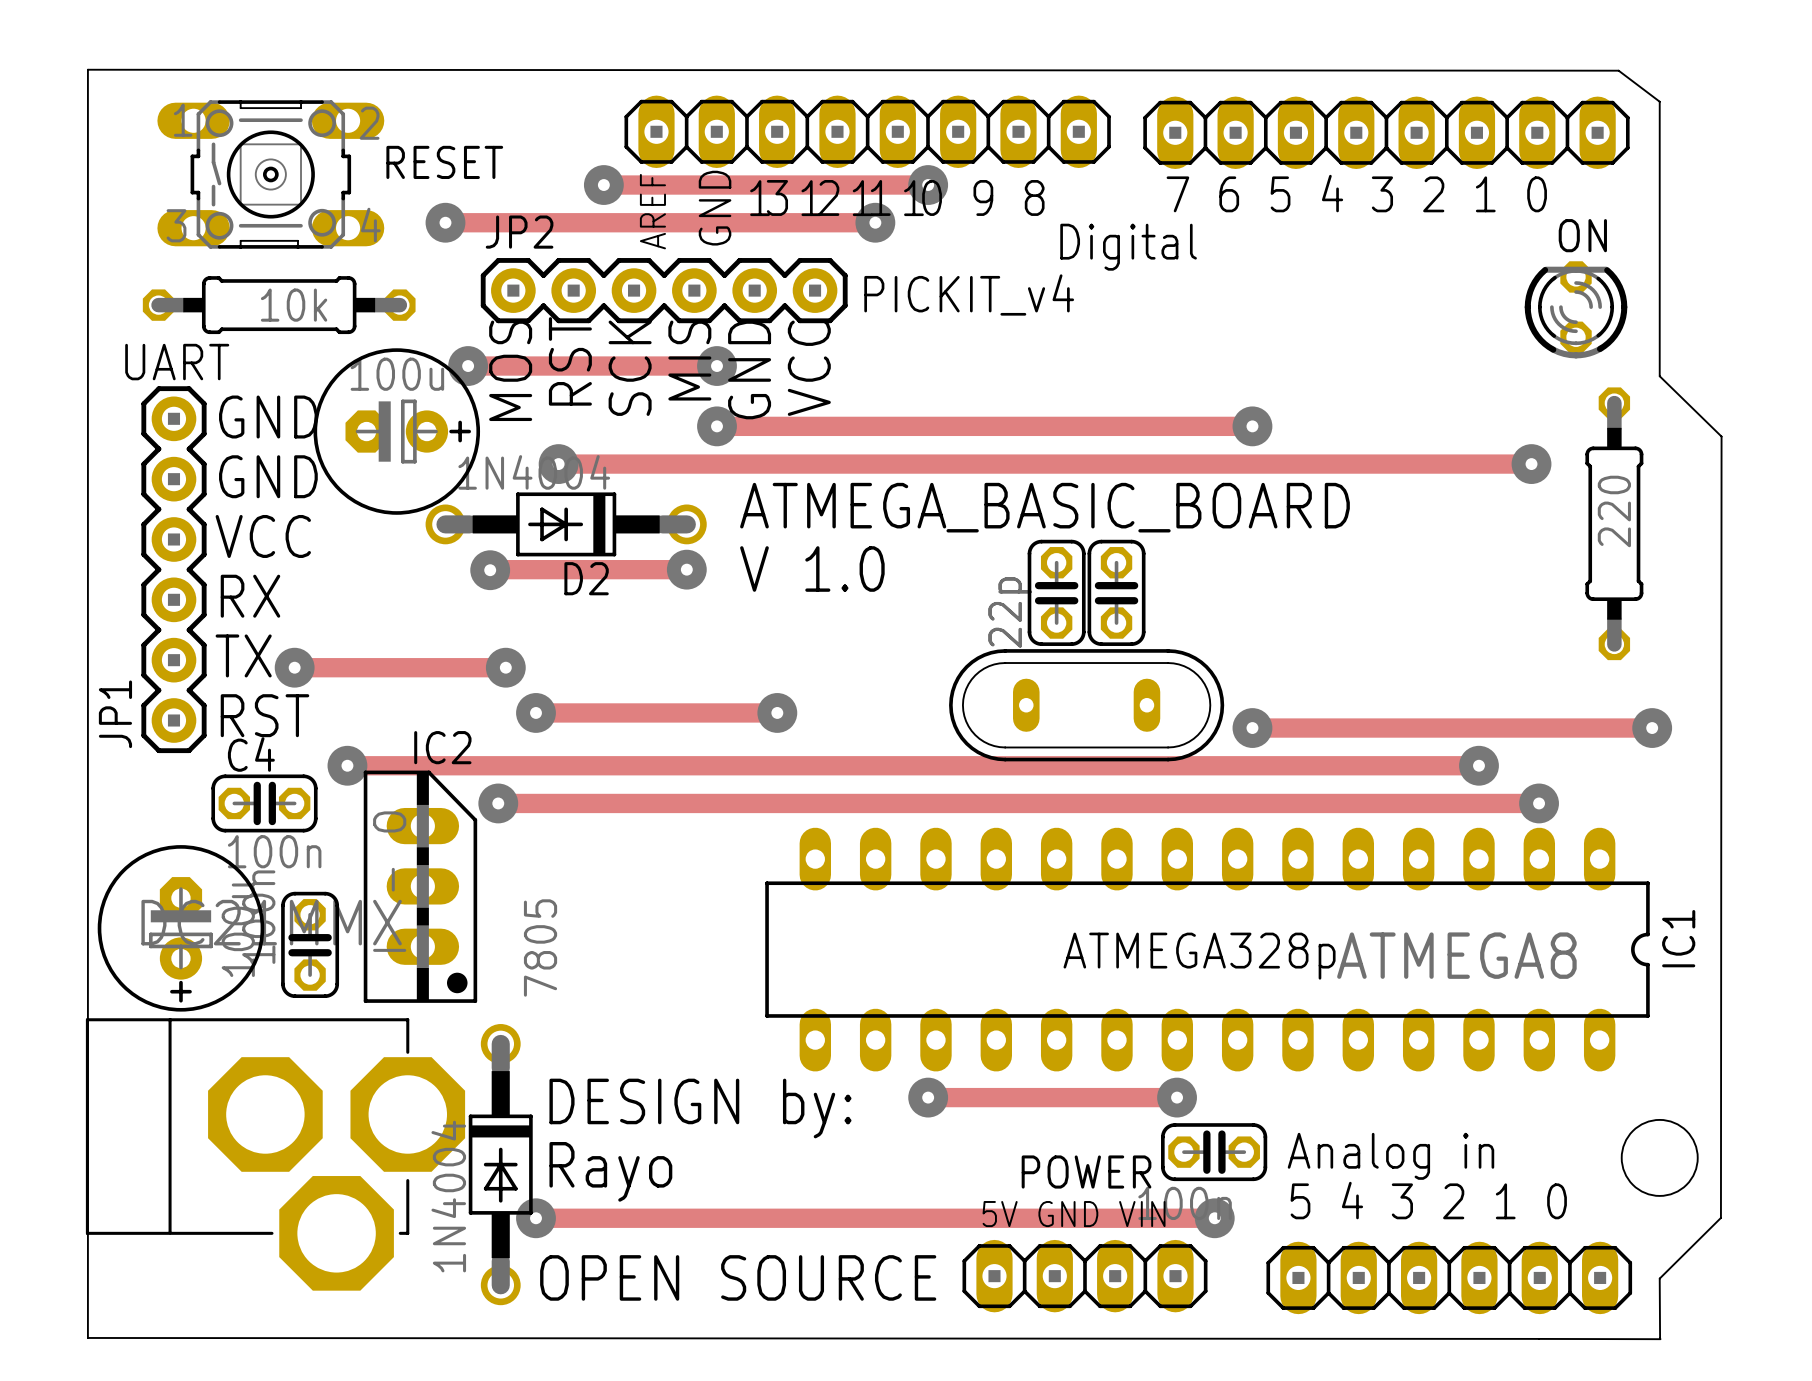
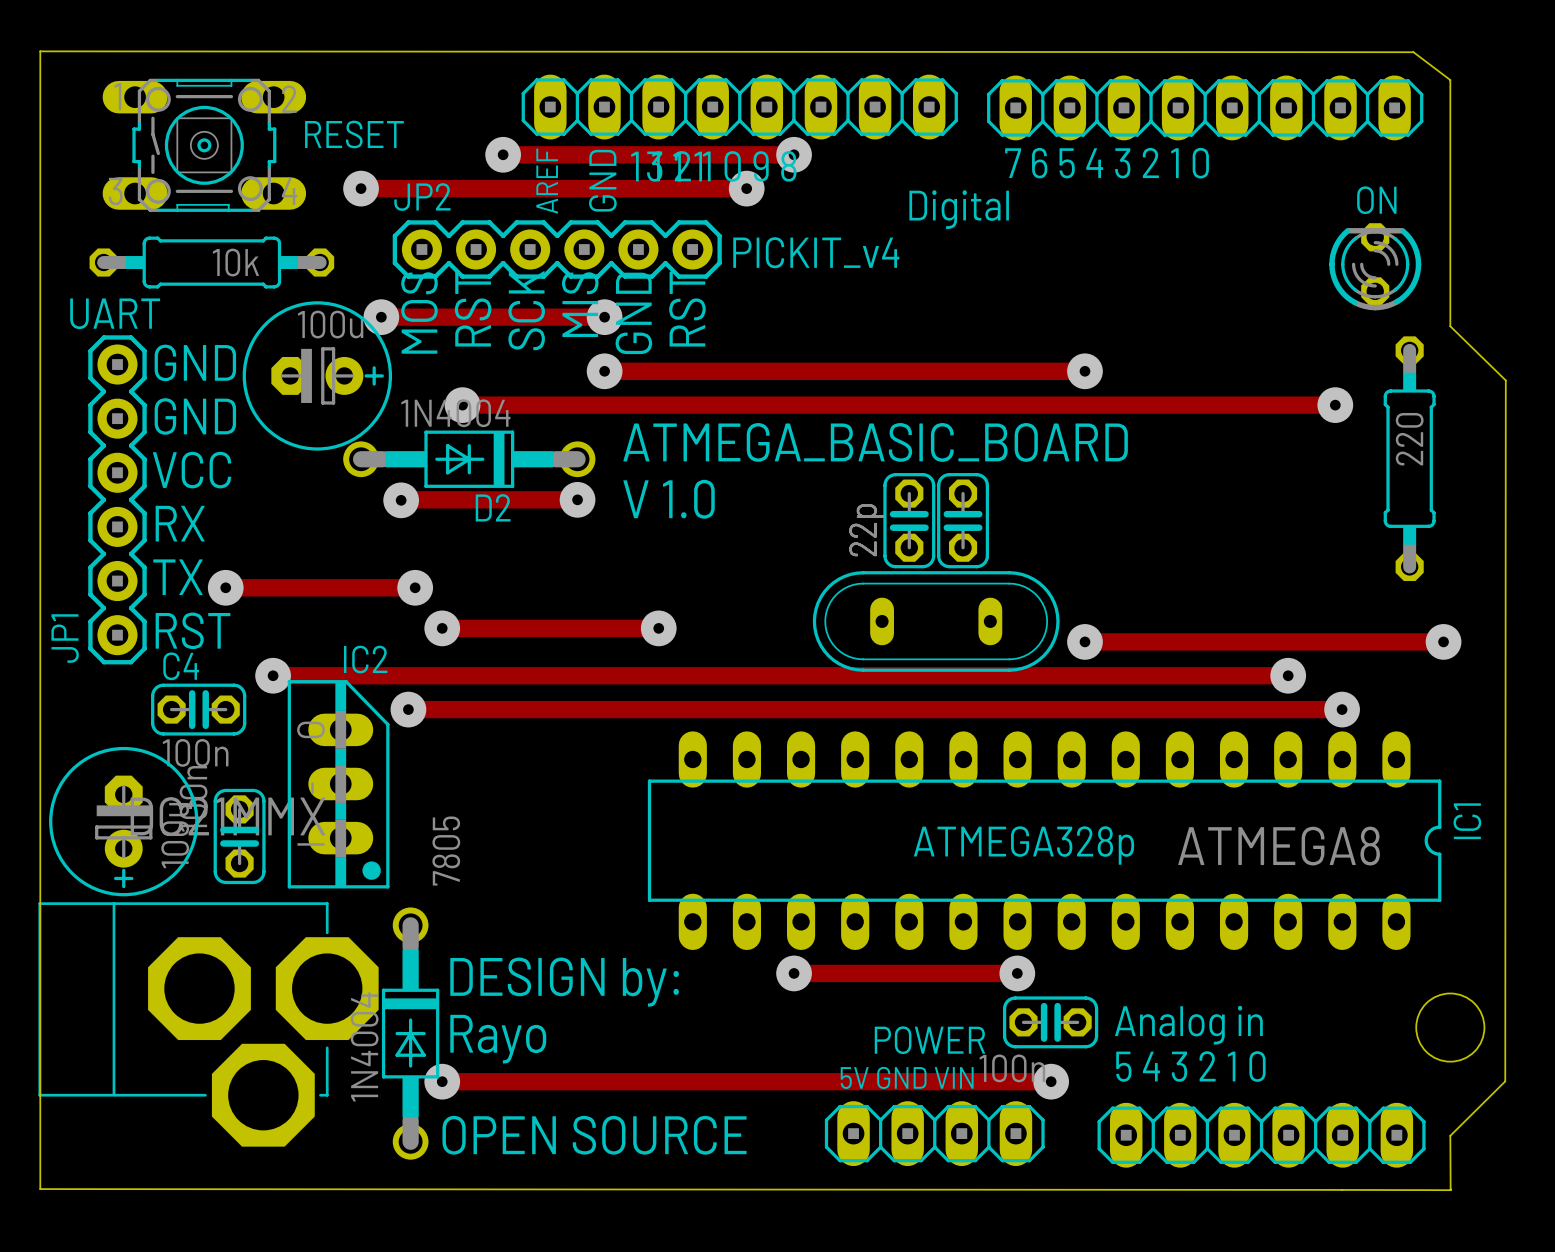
text: VCC (809, 368) -> RST (687, 309)

